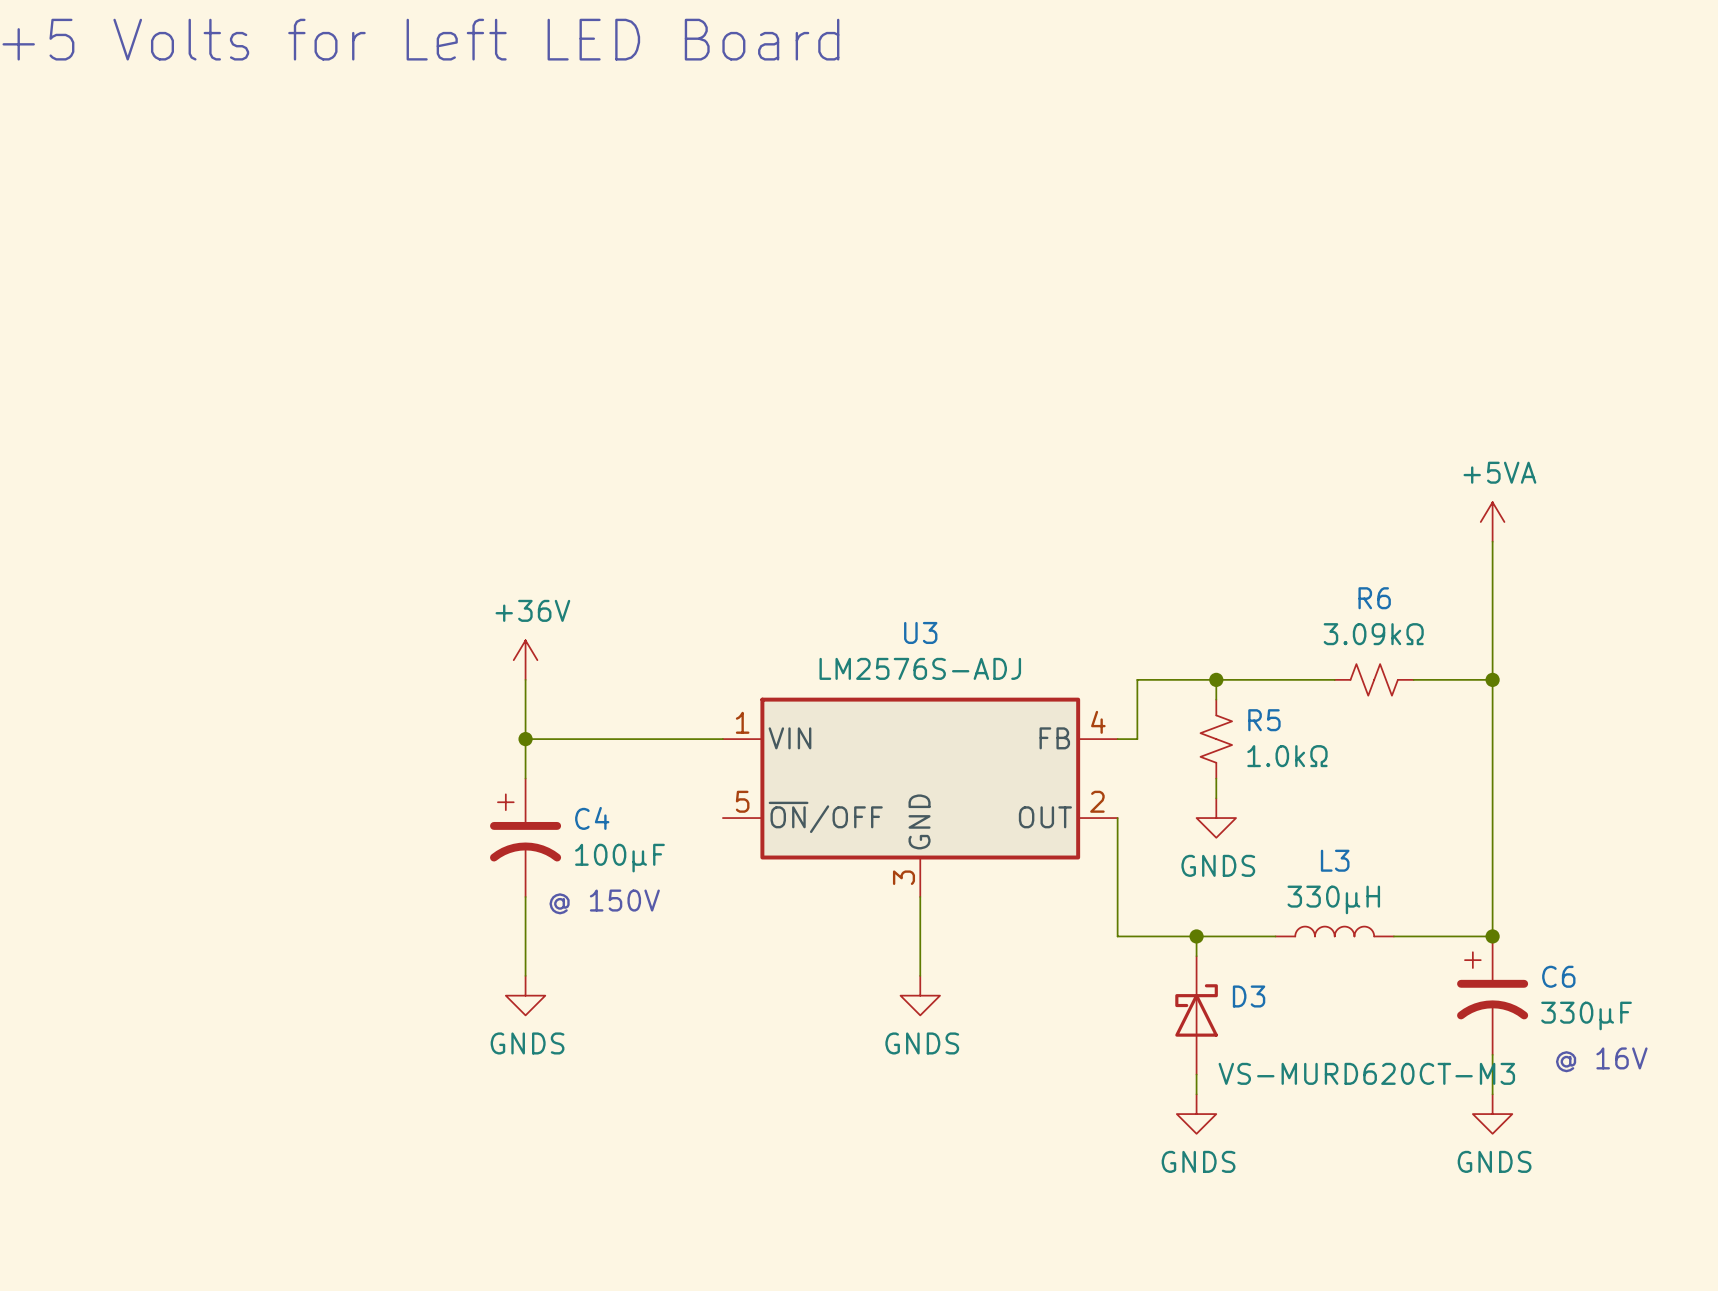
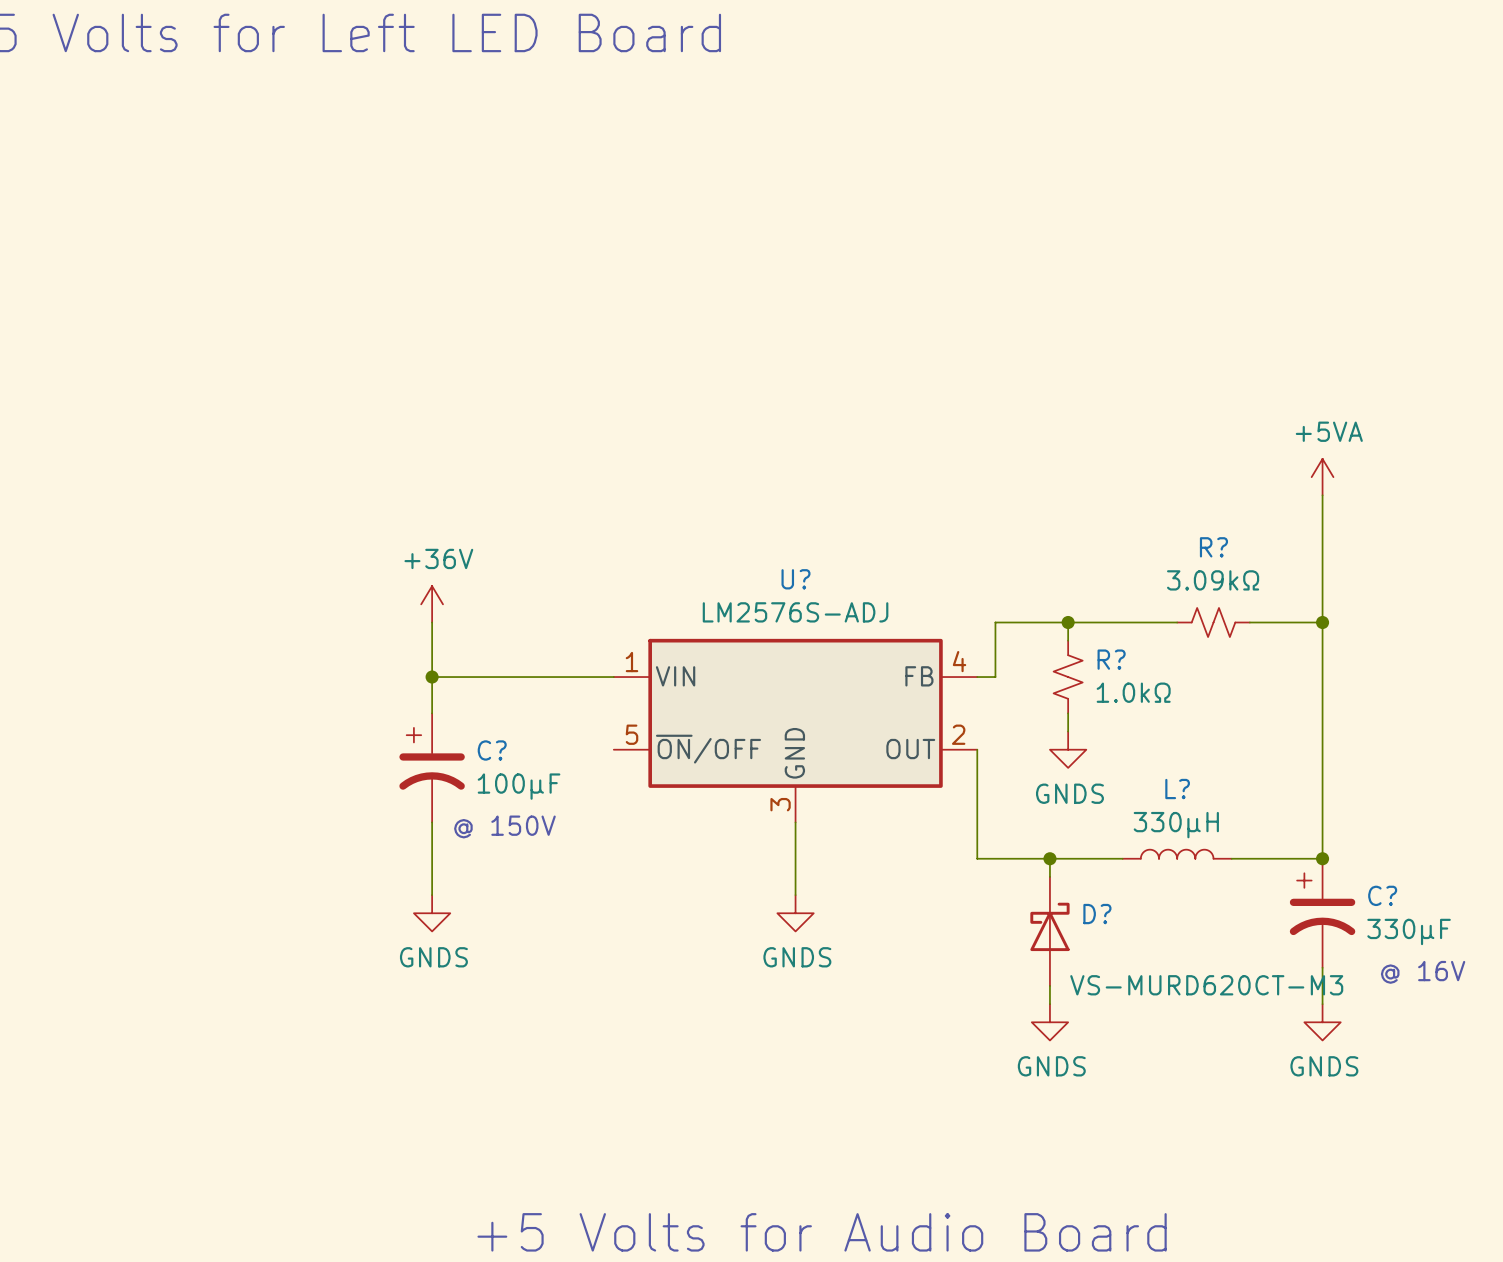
R6 name: R6 (1374, 598) -> R? (1213, 547)
U3 name: U3 (920, 632) -> U? (795, 579)
R5 name: R5 (1264, 720) -> R? (1111, 659)
C4 name: C4 (592, 818) -> C? (492, 750)
L3 name: L3 (1335, 860) -> L? (1177, 789)
C6 name: C6 (1558, 976) -> C? (1382, 895)
D3 name: D3 (1249, 996) -> D? (1097, 914)

